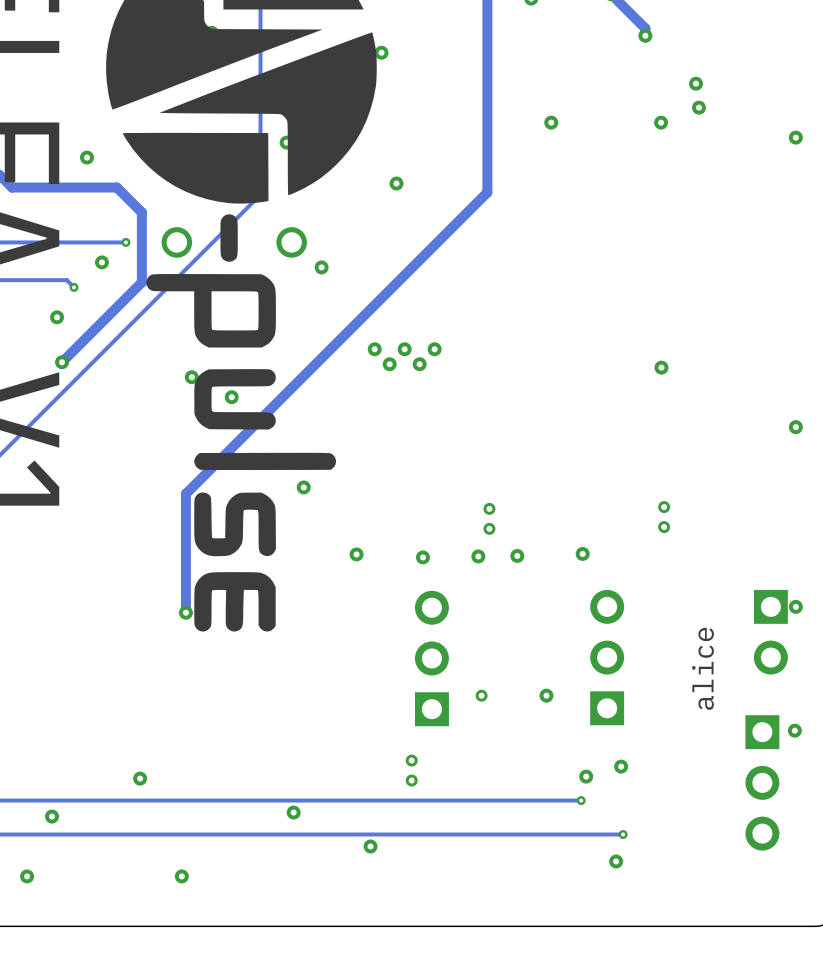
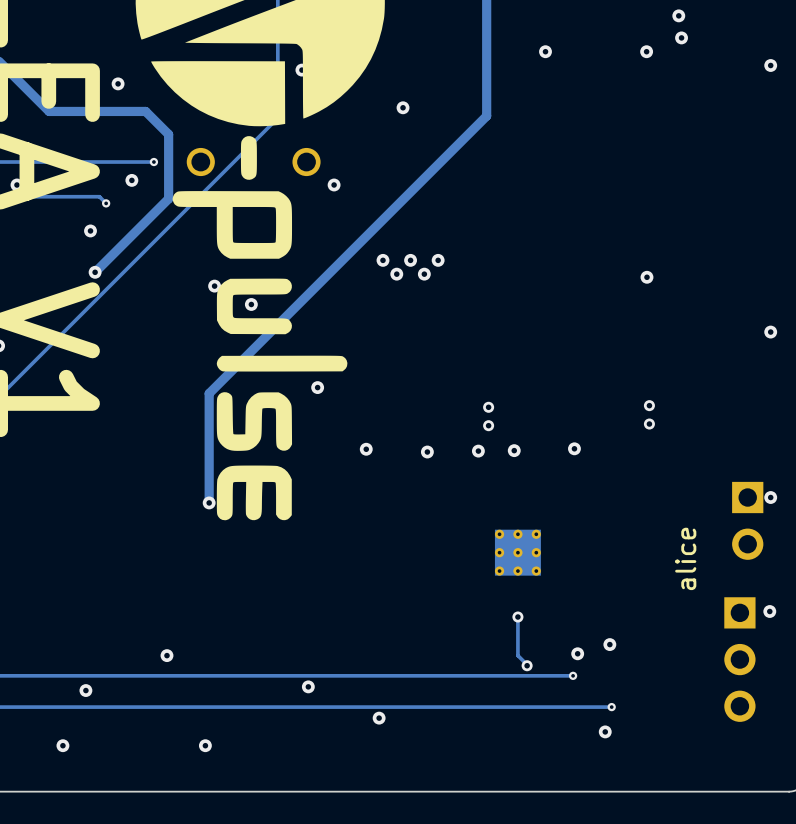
part: (607, 657) -> none
part: (431, 658) -> none
part: none -> (517, 552)
via: (481, 695) -> none
via: (546, 695) -> none
track: none -> (517, 617) (517, 655) (527, 665)
via: none -> (517, 617)
via: (411, 760) -> none
via: (411, 780) -> none
via: none -> (527, 665)

